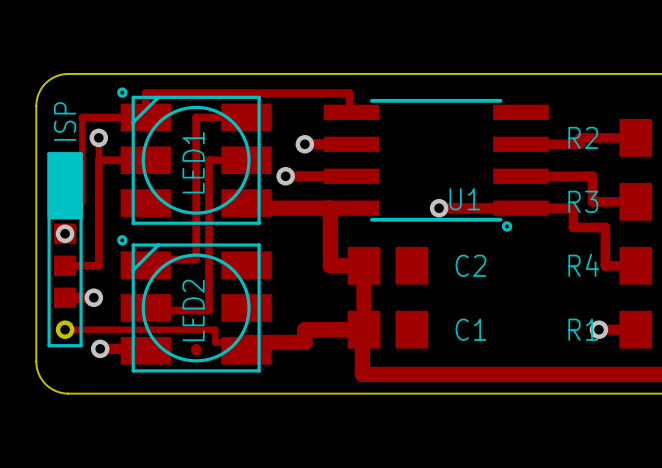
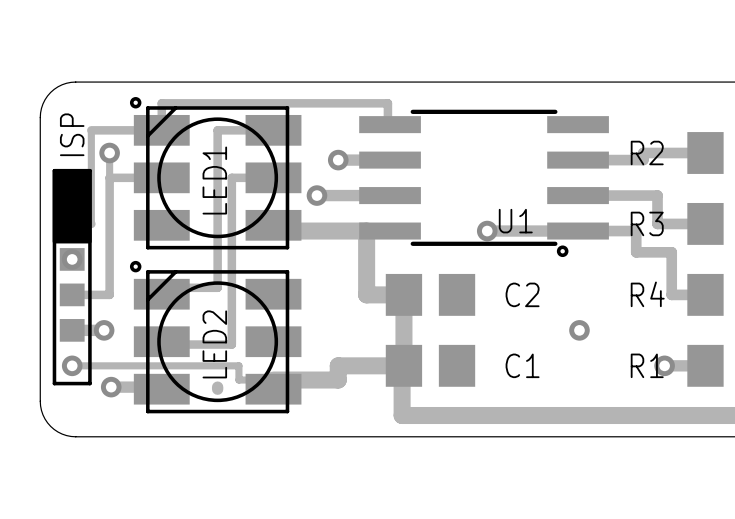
via: none -> (579, 330)

